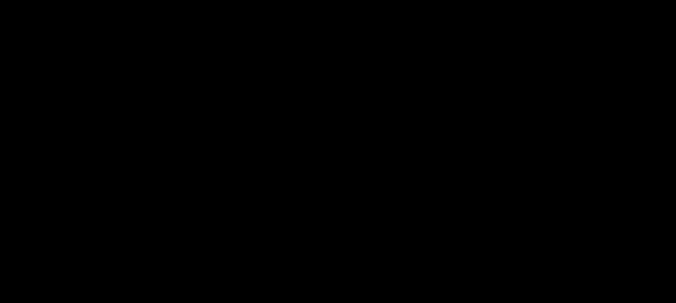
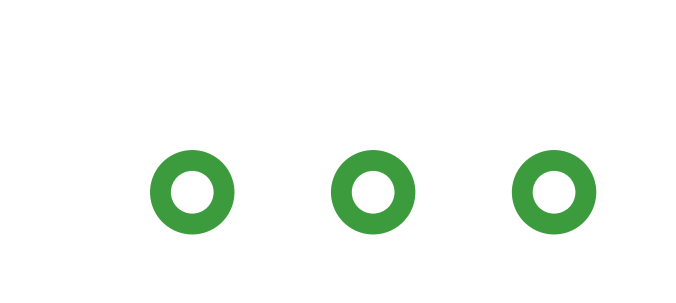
part: none -> (192, 192)
part: none -> (373, 192)
part: none -> (554, 192)

